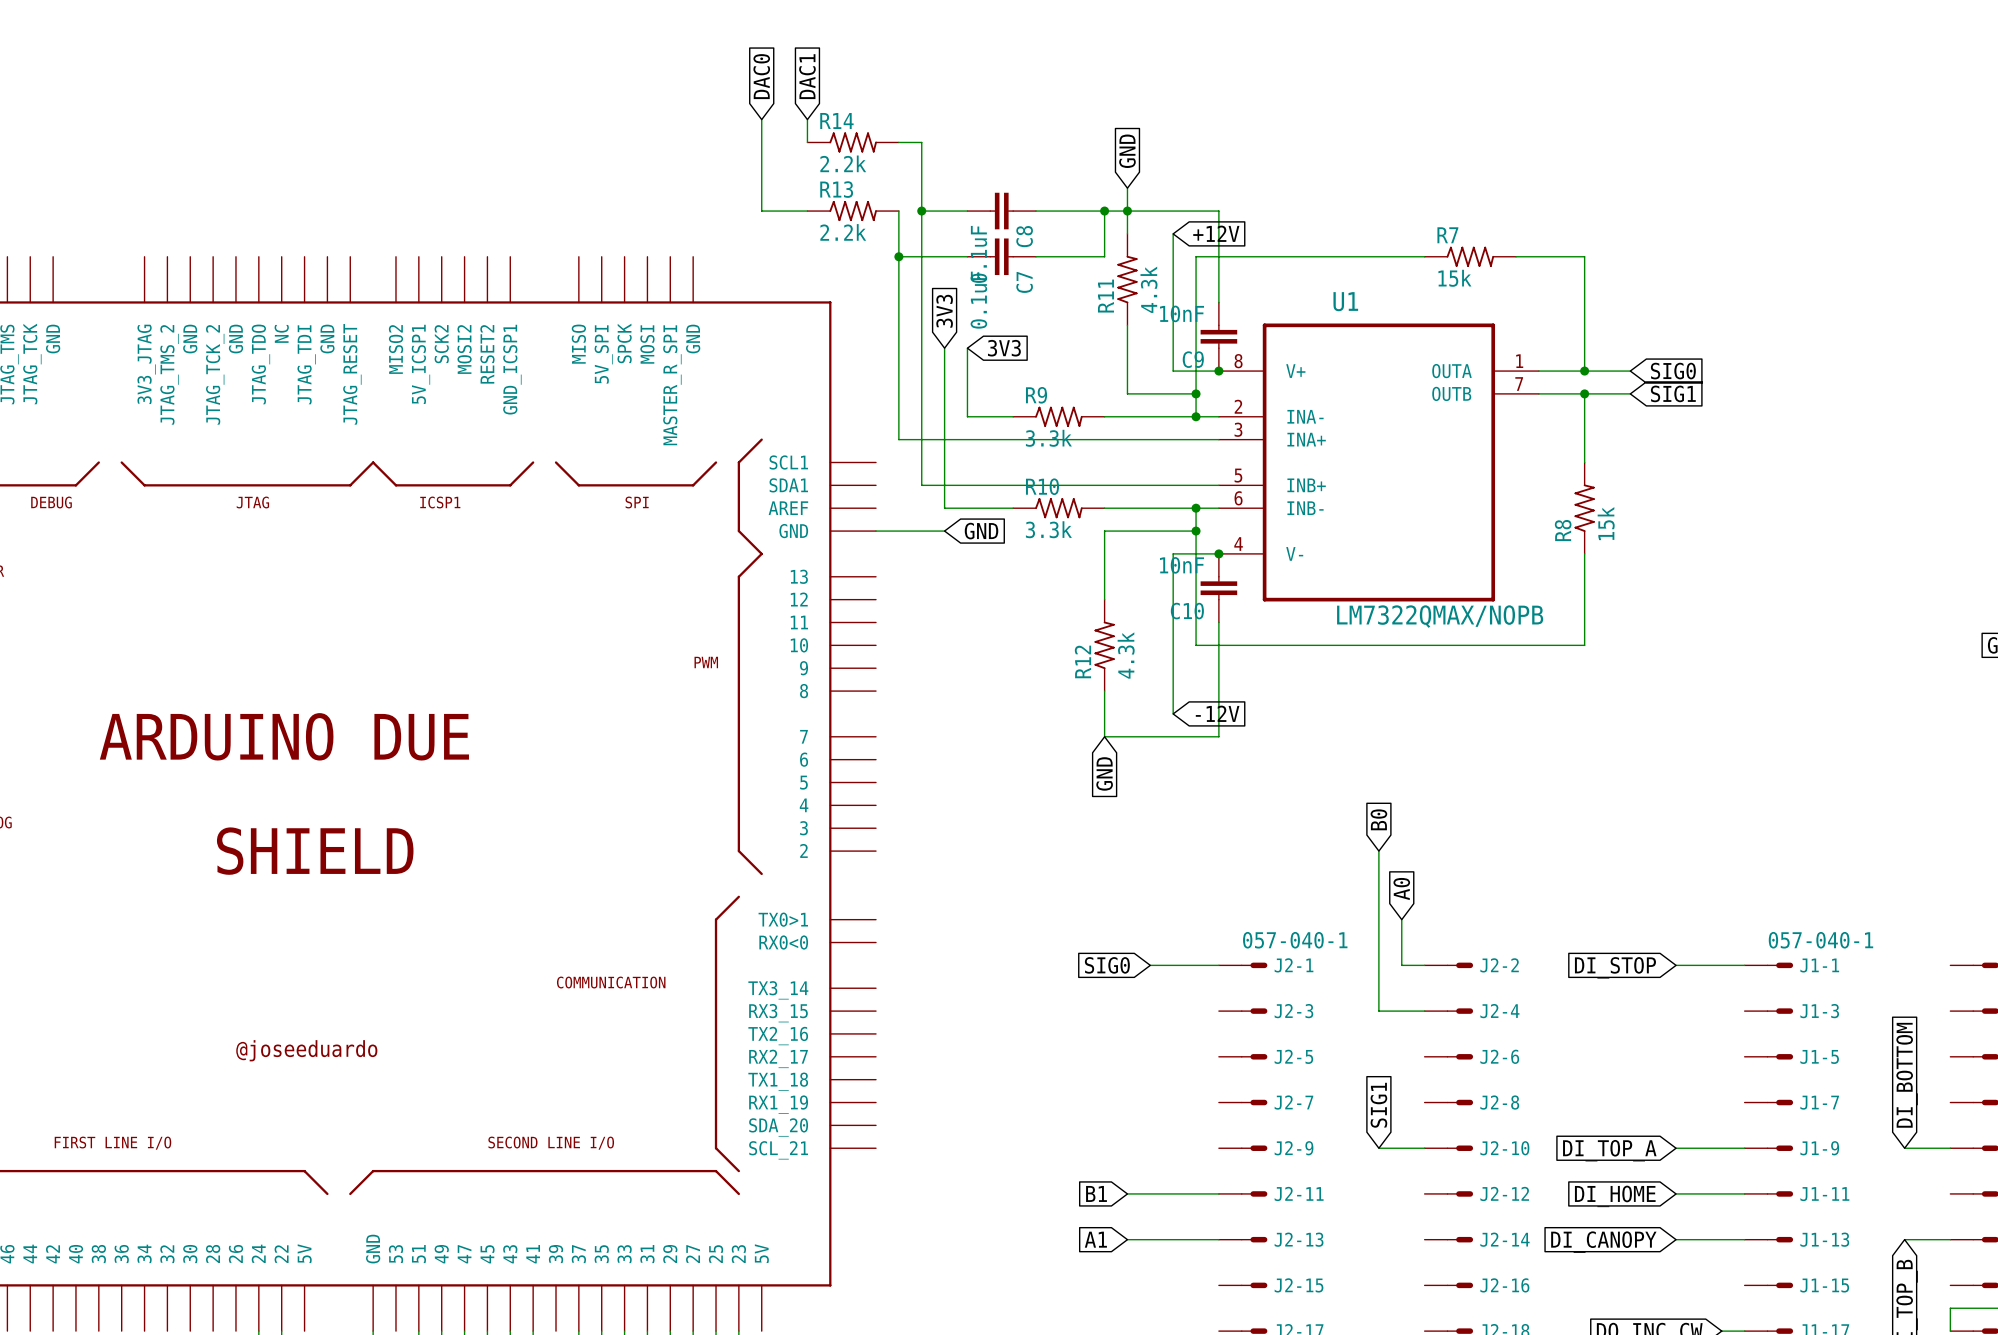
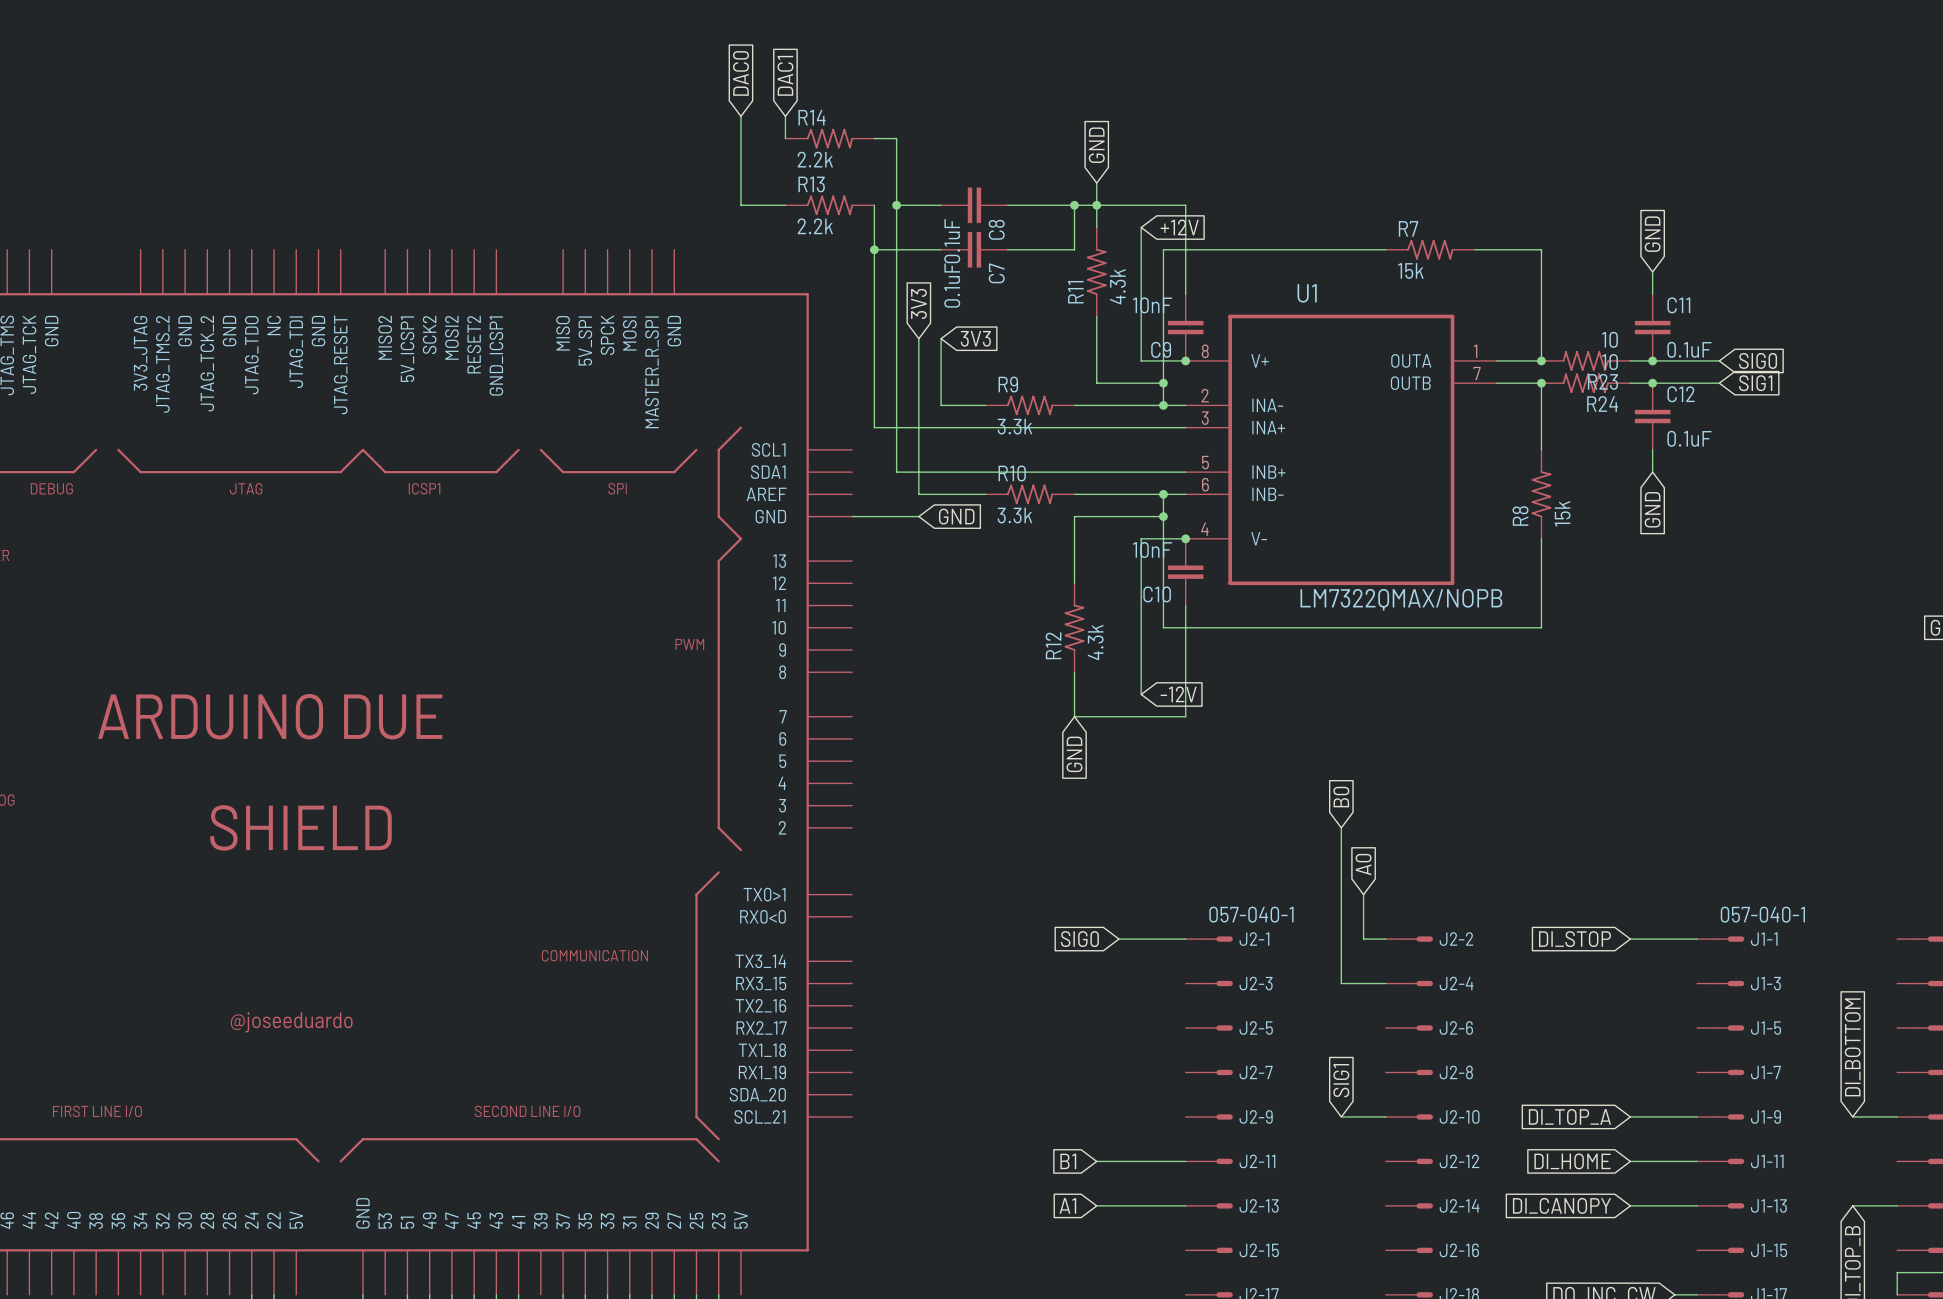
global label: none -> GND (1652, 234)
wire: none -> (1652, 272) (1652, 294)
C11: none -> 0.1uF (1652, 327)
R23: none -> 10 (1585, 360)
global label position: SIG0 (1673, 371) -> SIG0 (1758, 360)
wire: none -> (1630, 360) (1719, 360)
junction: none -> (1652, 360)
R24: none -> 10 (1585, 383)
global label position: SIG1 (1673, 393) -> SIG1 (1755, 383)
wire: none -> (1630, 383) (1719, 383)
junction: none -> (1652, 383)
C12: none -> 0.1uF (1652, 416)
wire: none -> (1652, 449) (1652, 472)
global label: none -> GND (1652, 509)

